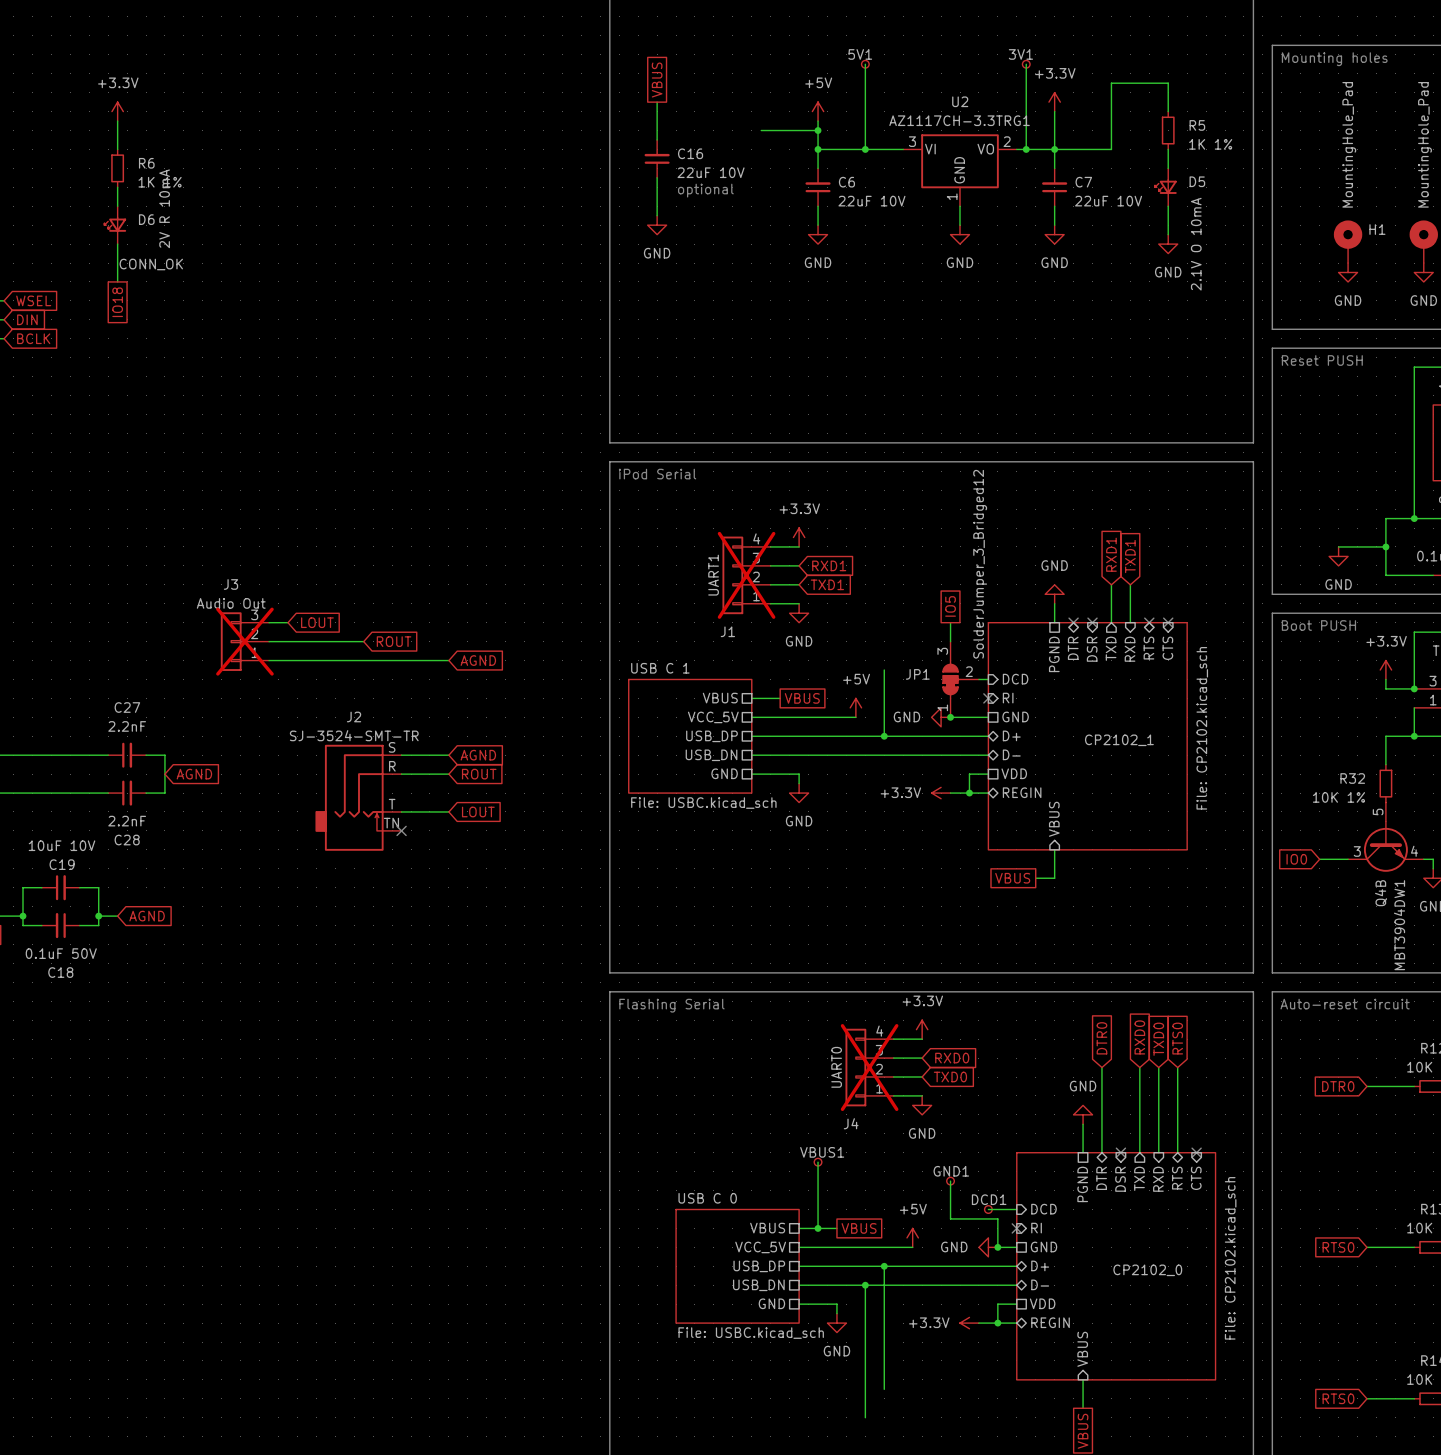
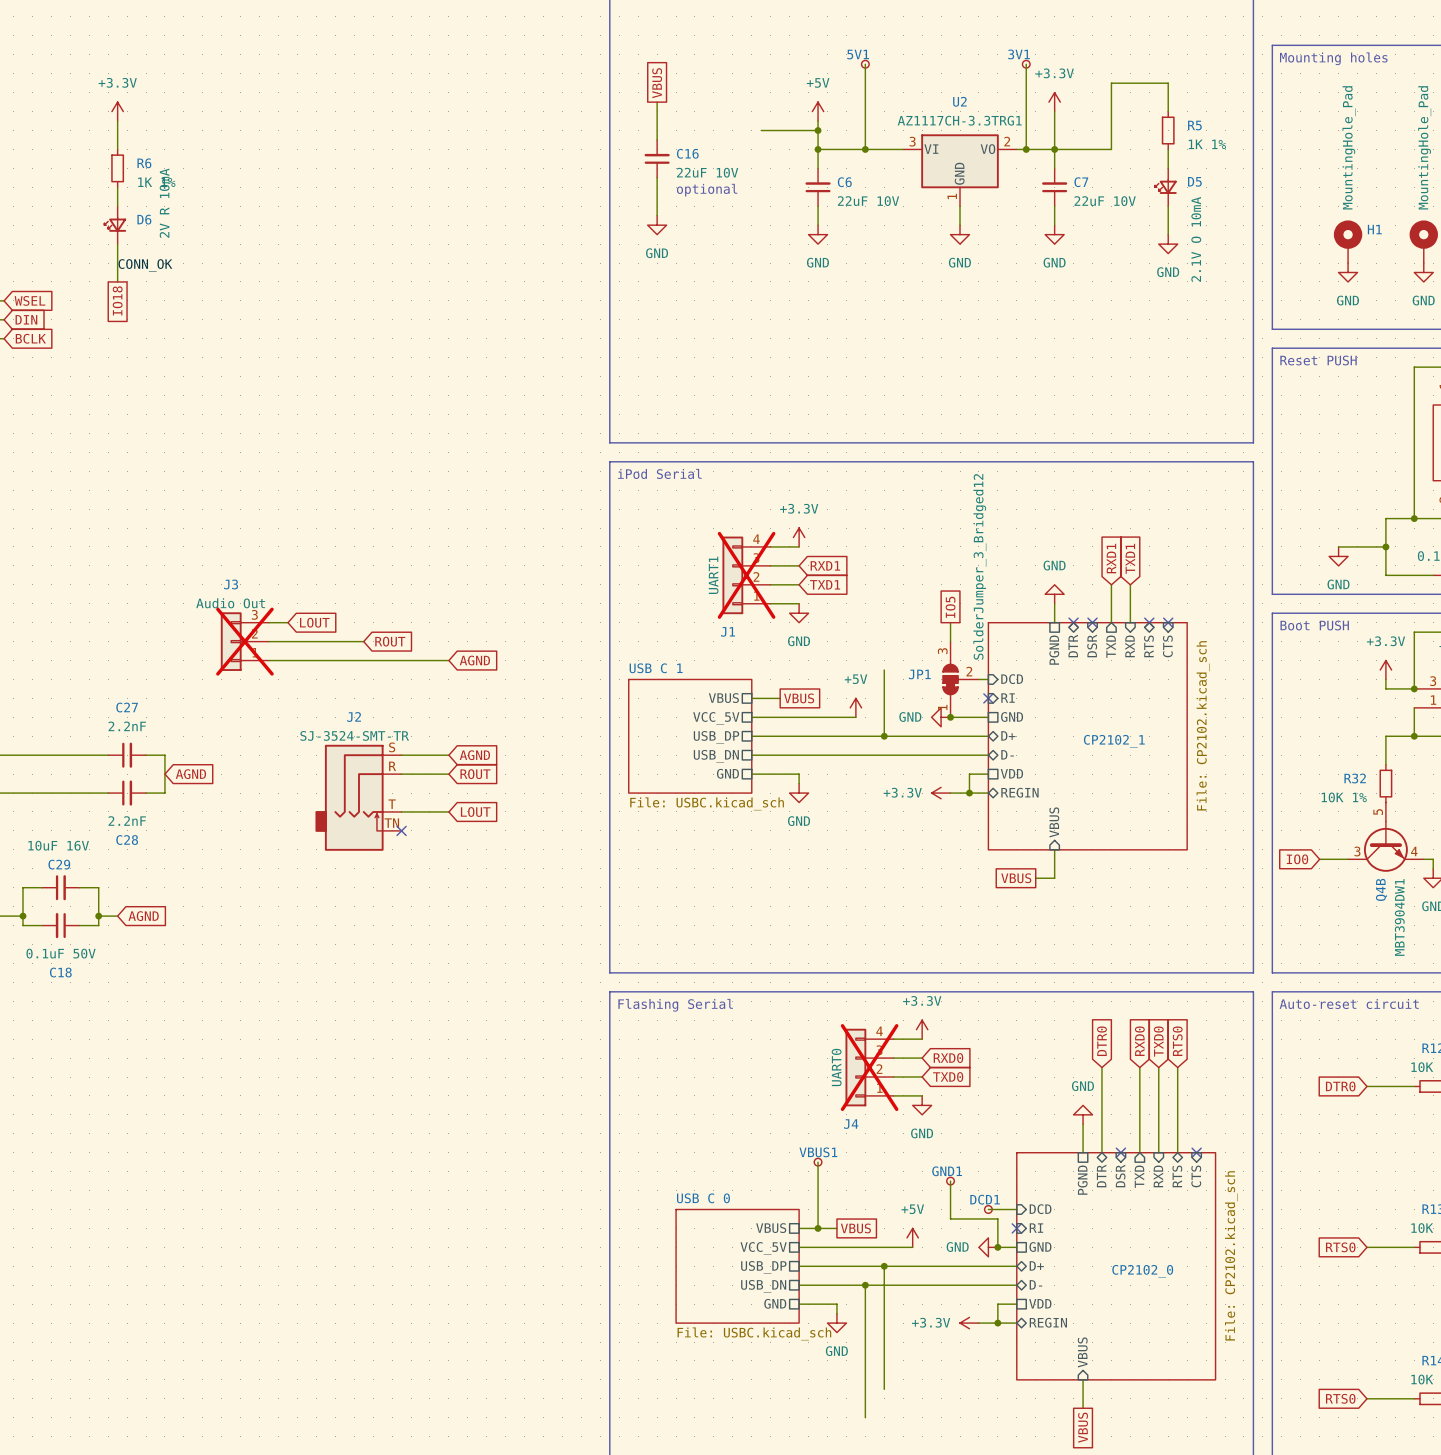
C19 value: 10uF 10V (62, 845) -> 10uF 16V (58, 845)
C19 name: C19 (62, 864) -> C29 (59, 864)

